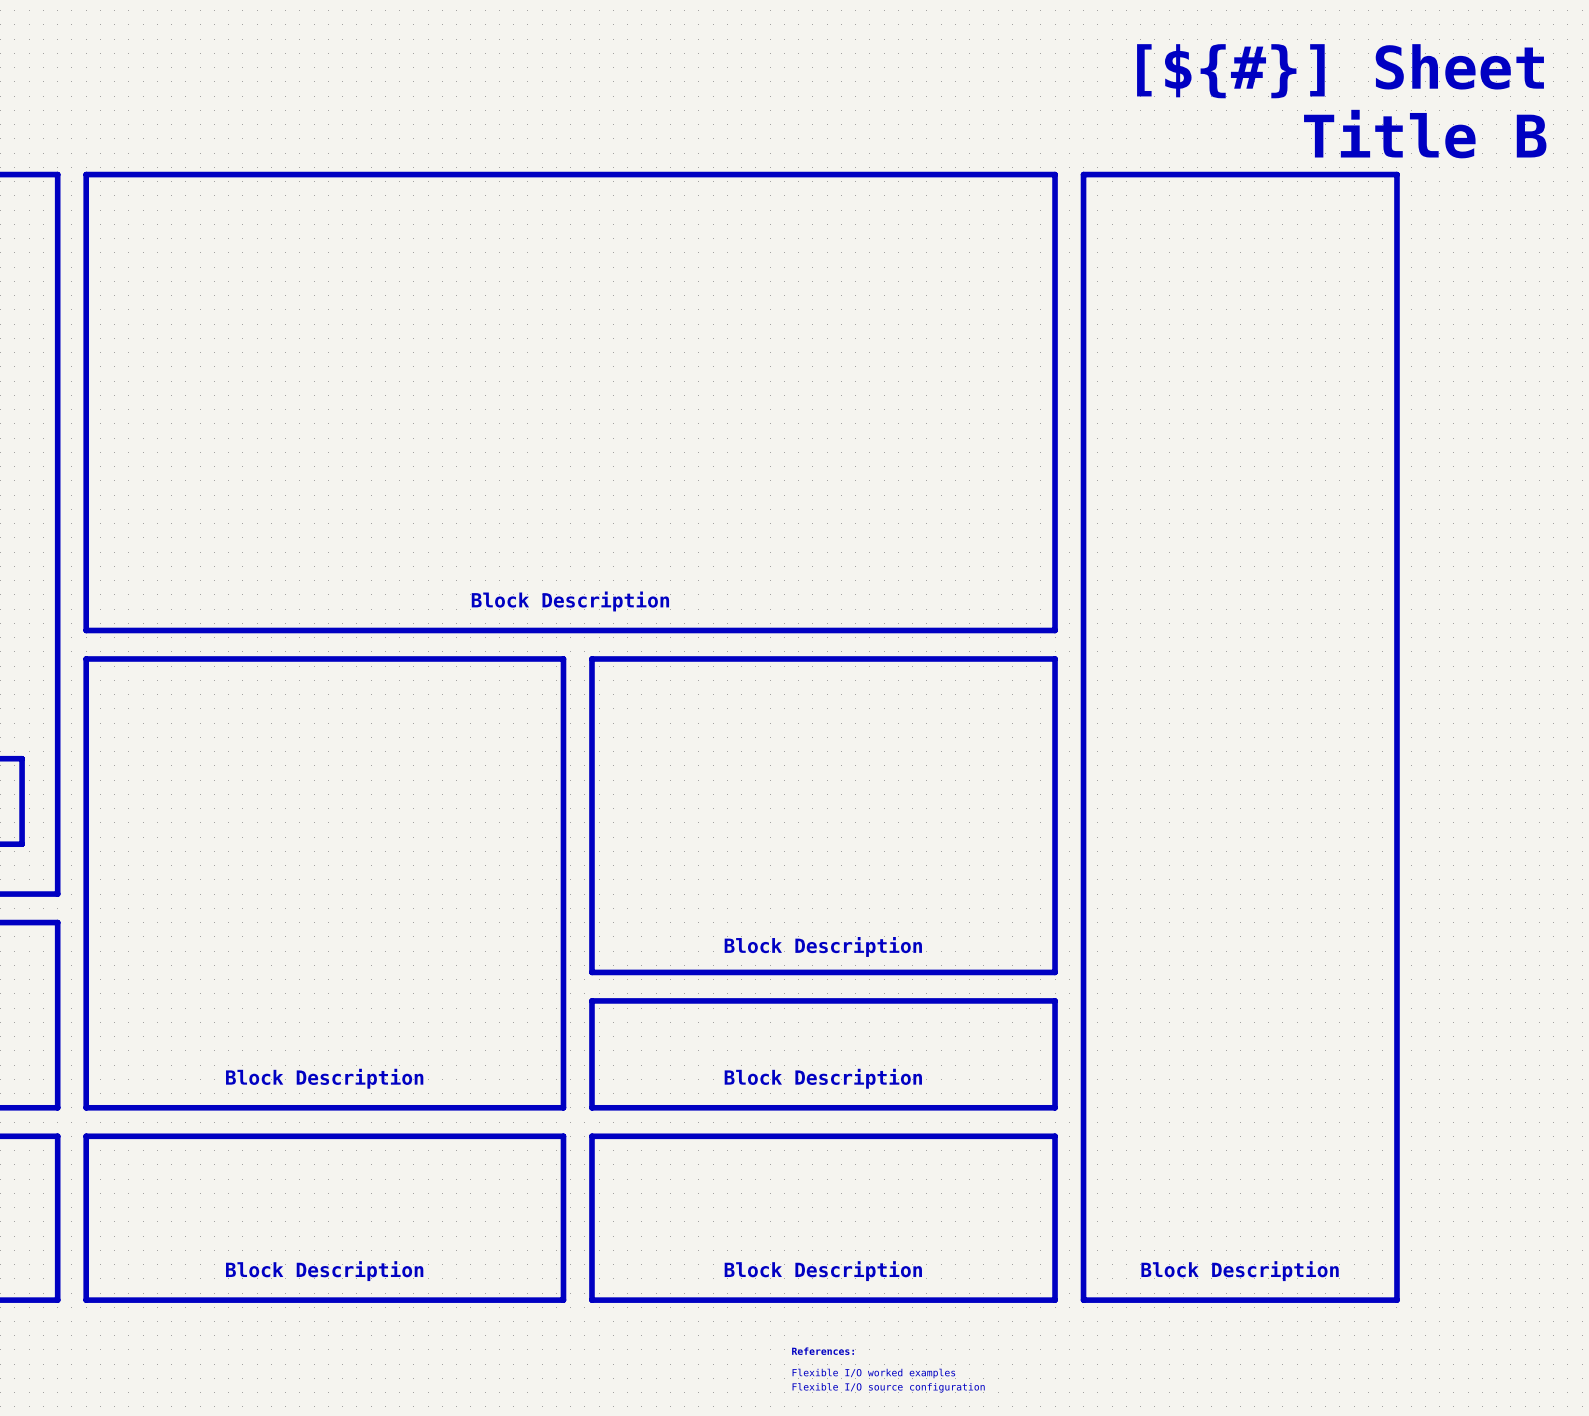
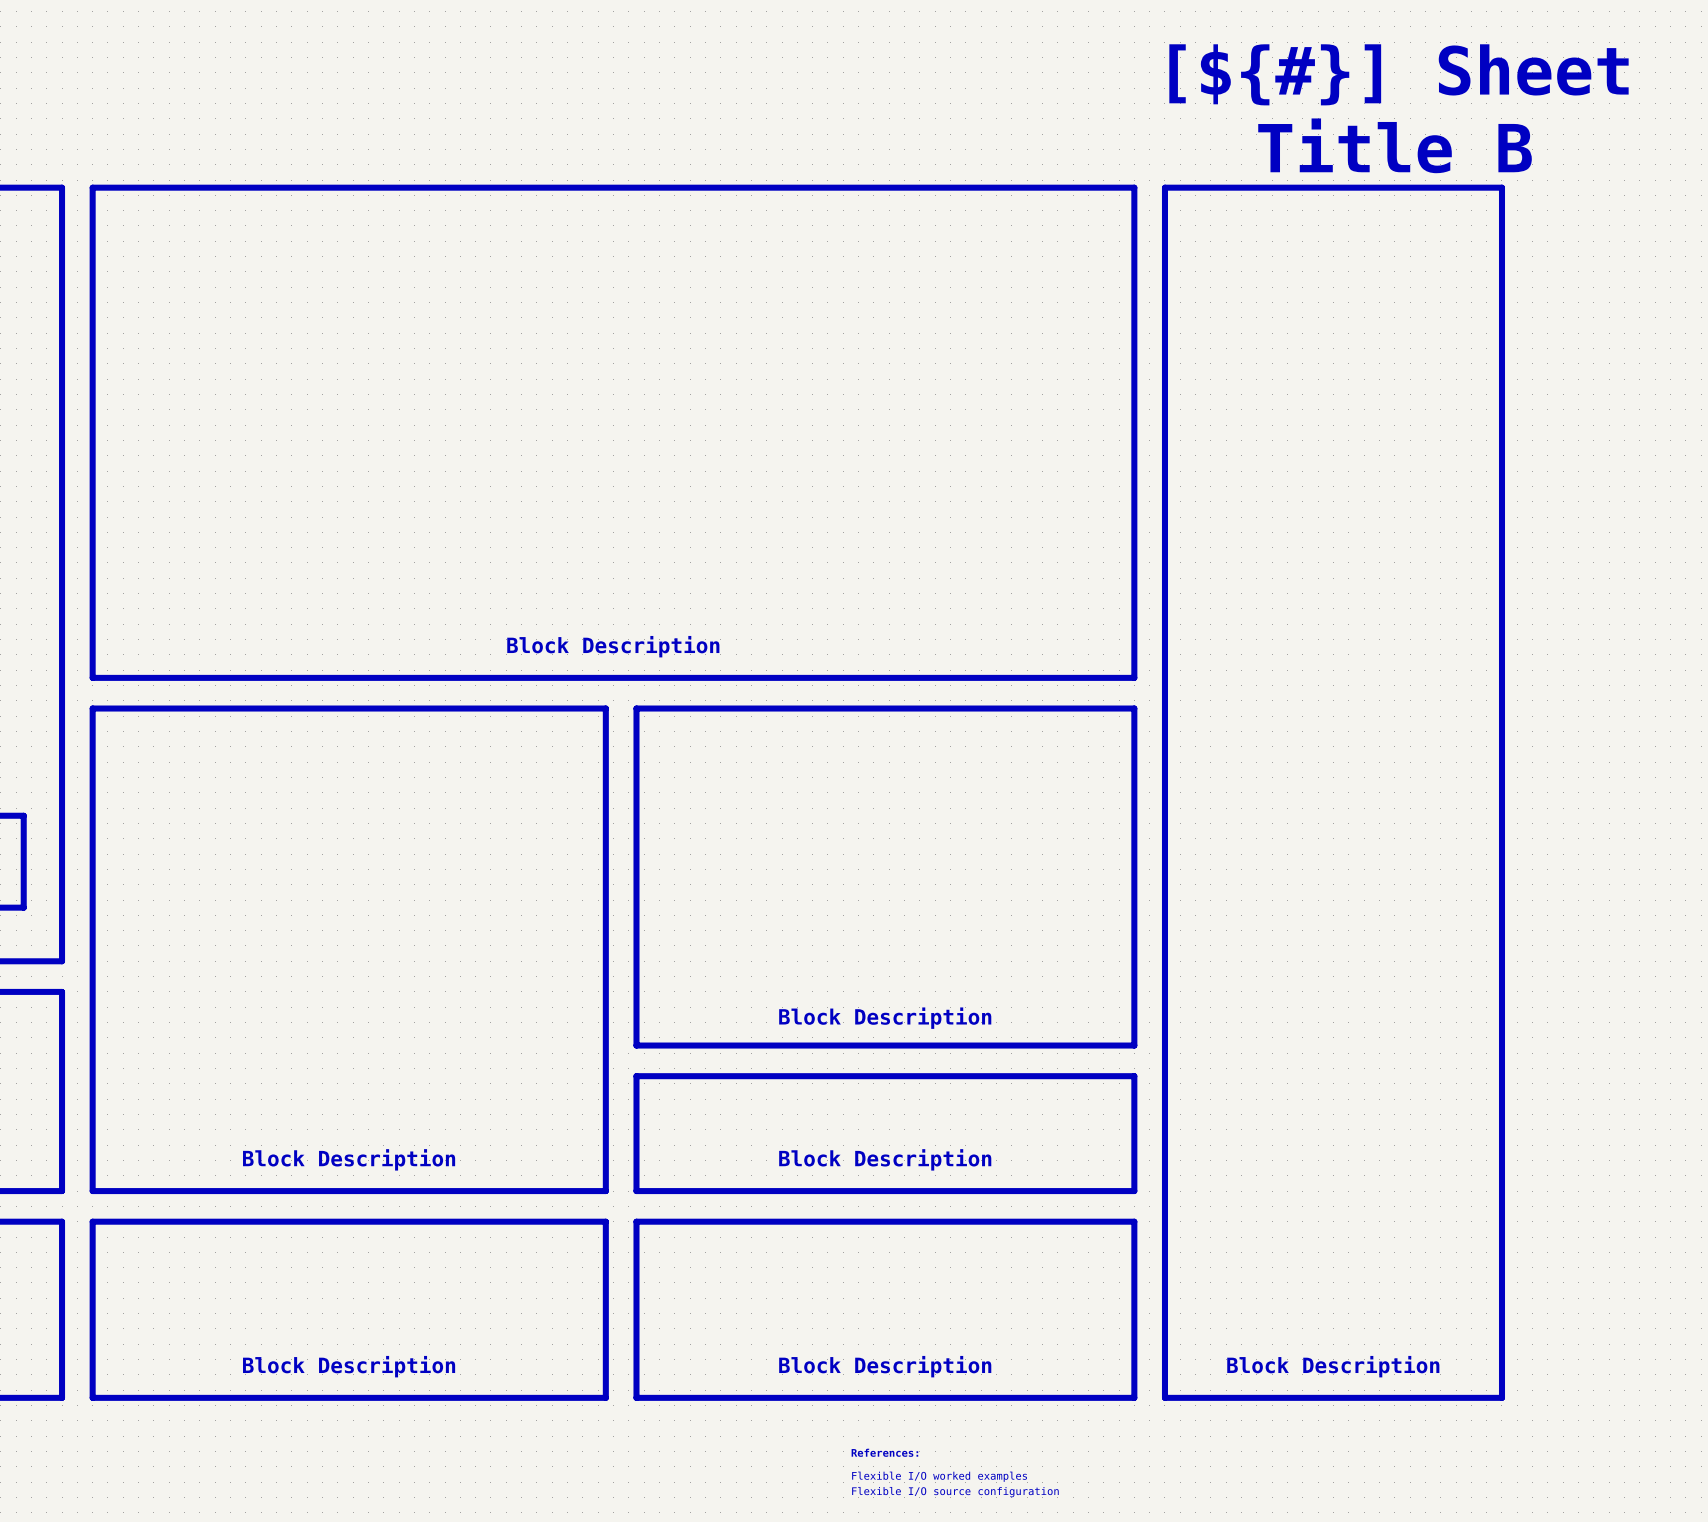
text: none -> [${#}] Sheet (1399, 74)
text: [${#}] Sheet (1340, 71) -> none
text: Title B (1425, 134) -> none
text: none -> Title B (1395, 145)

